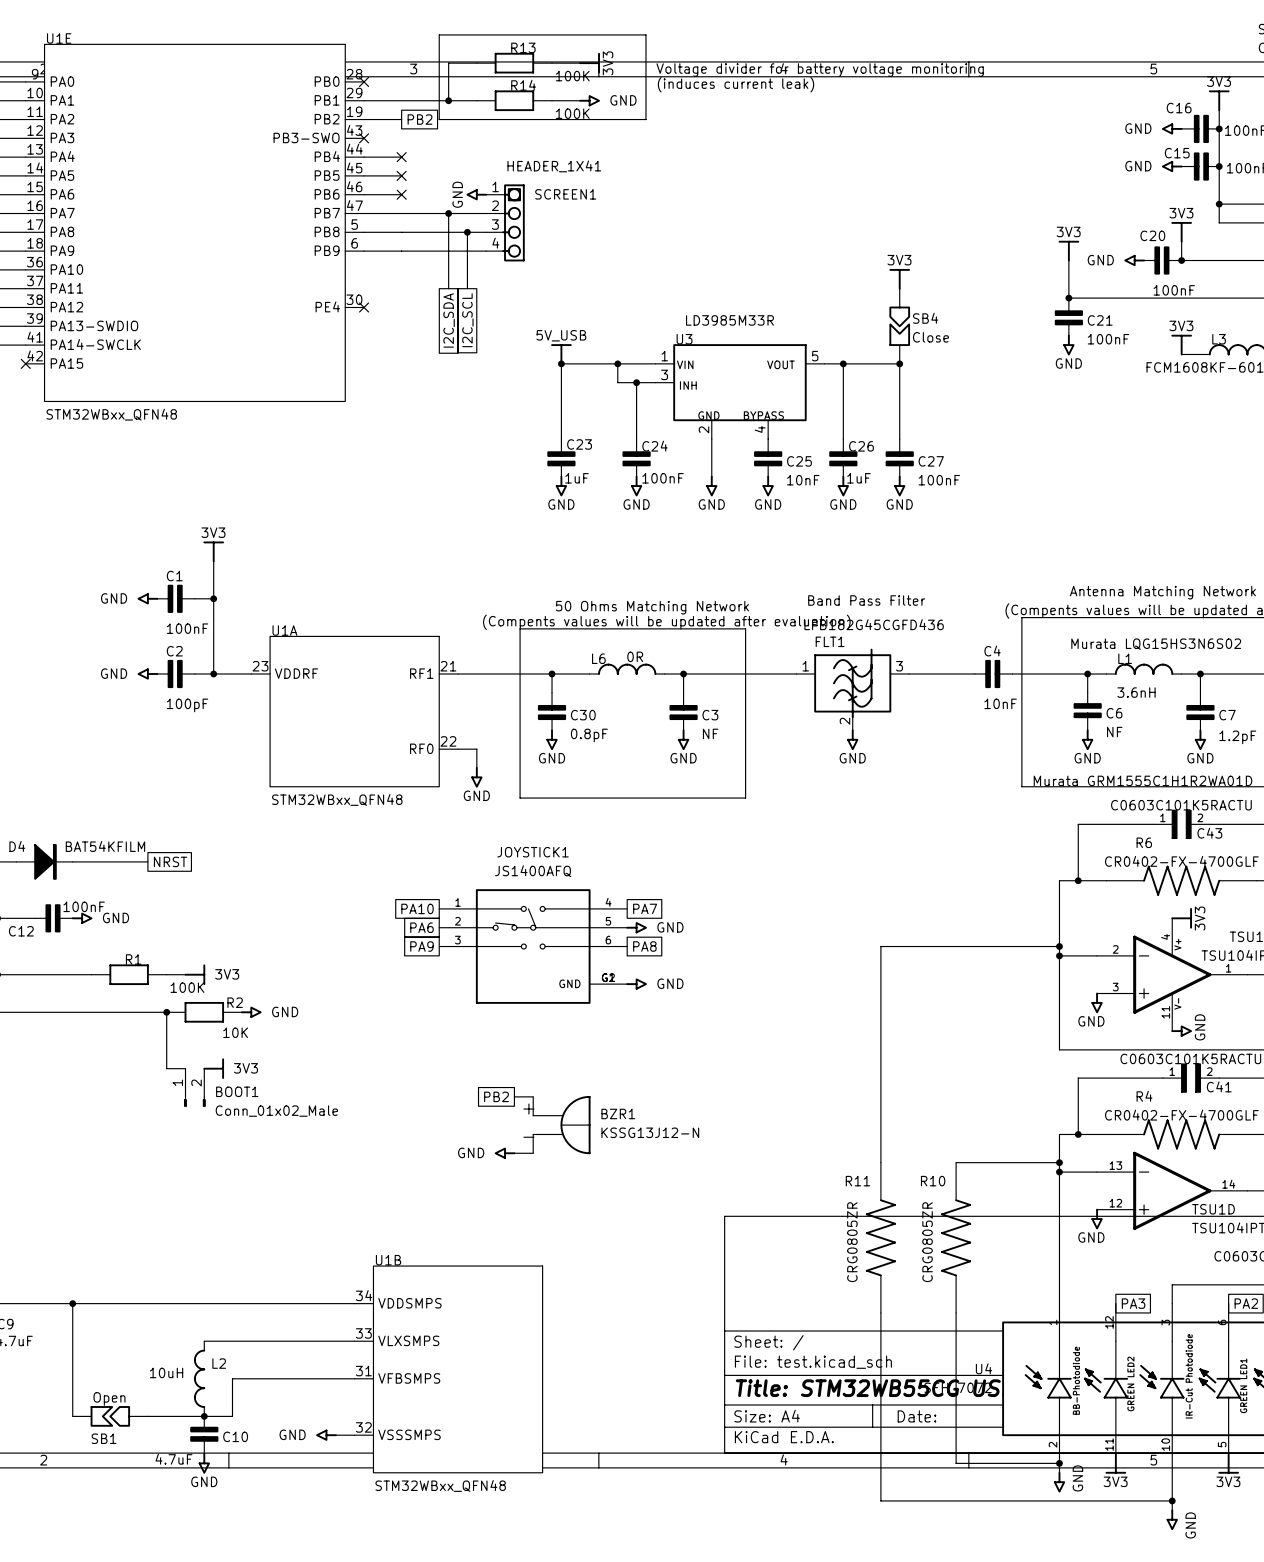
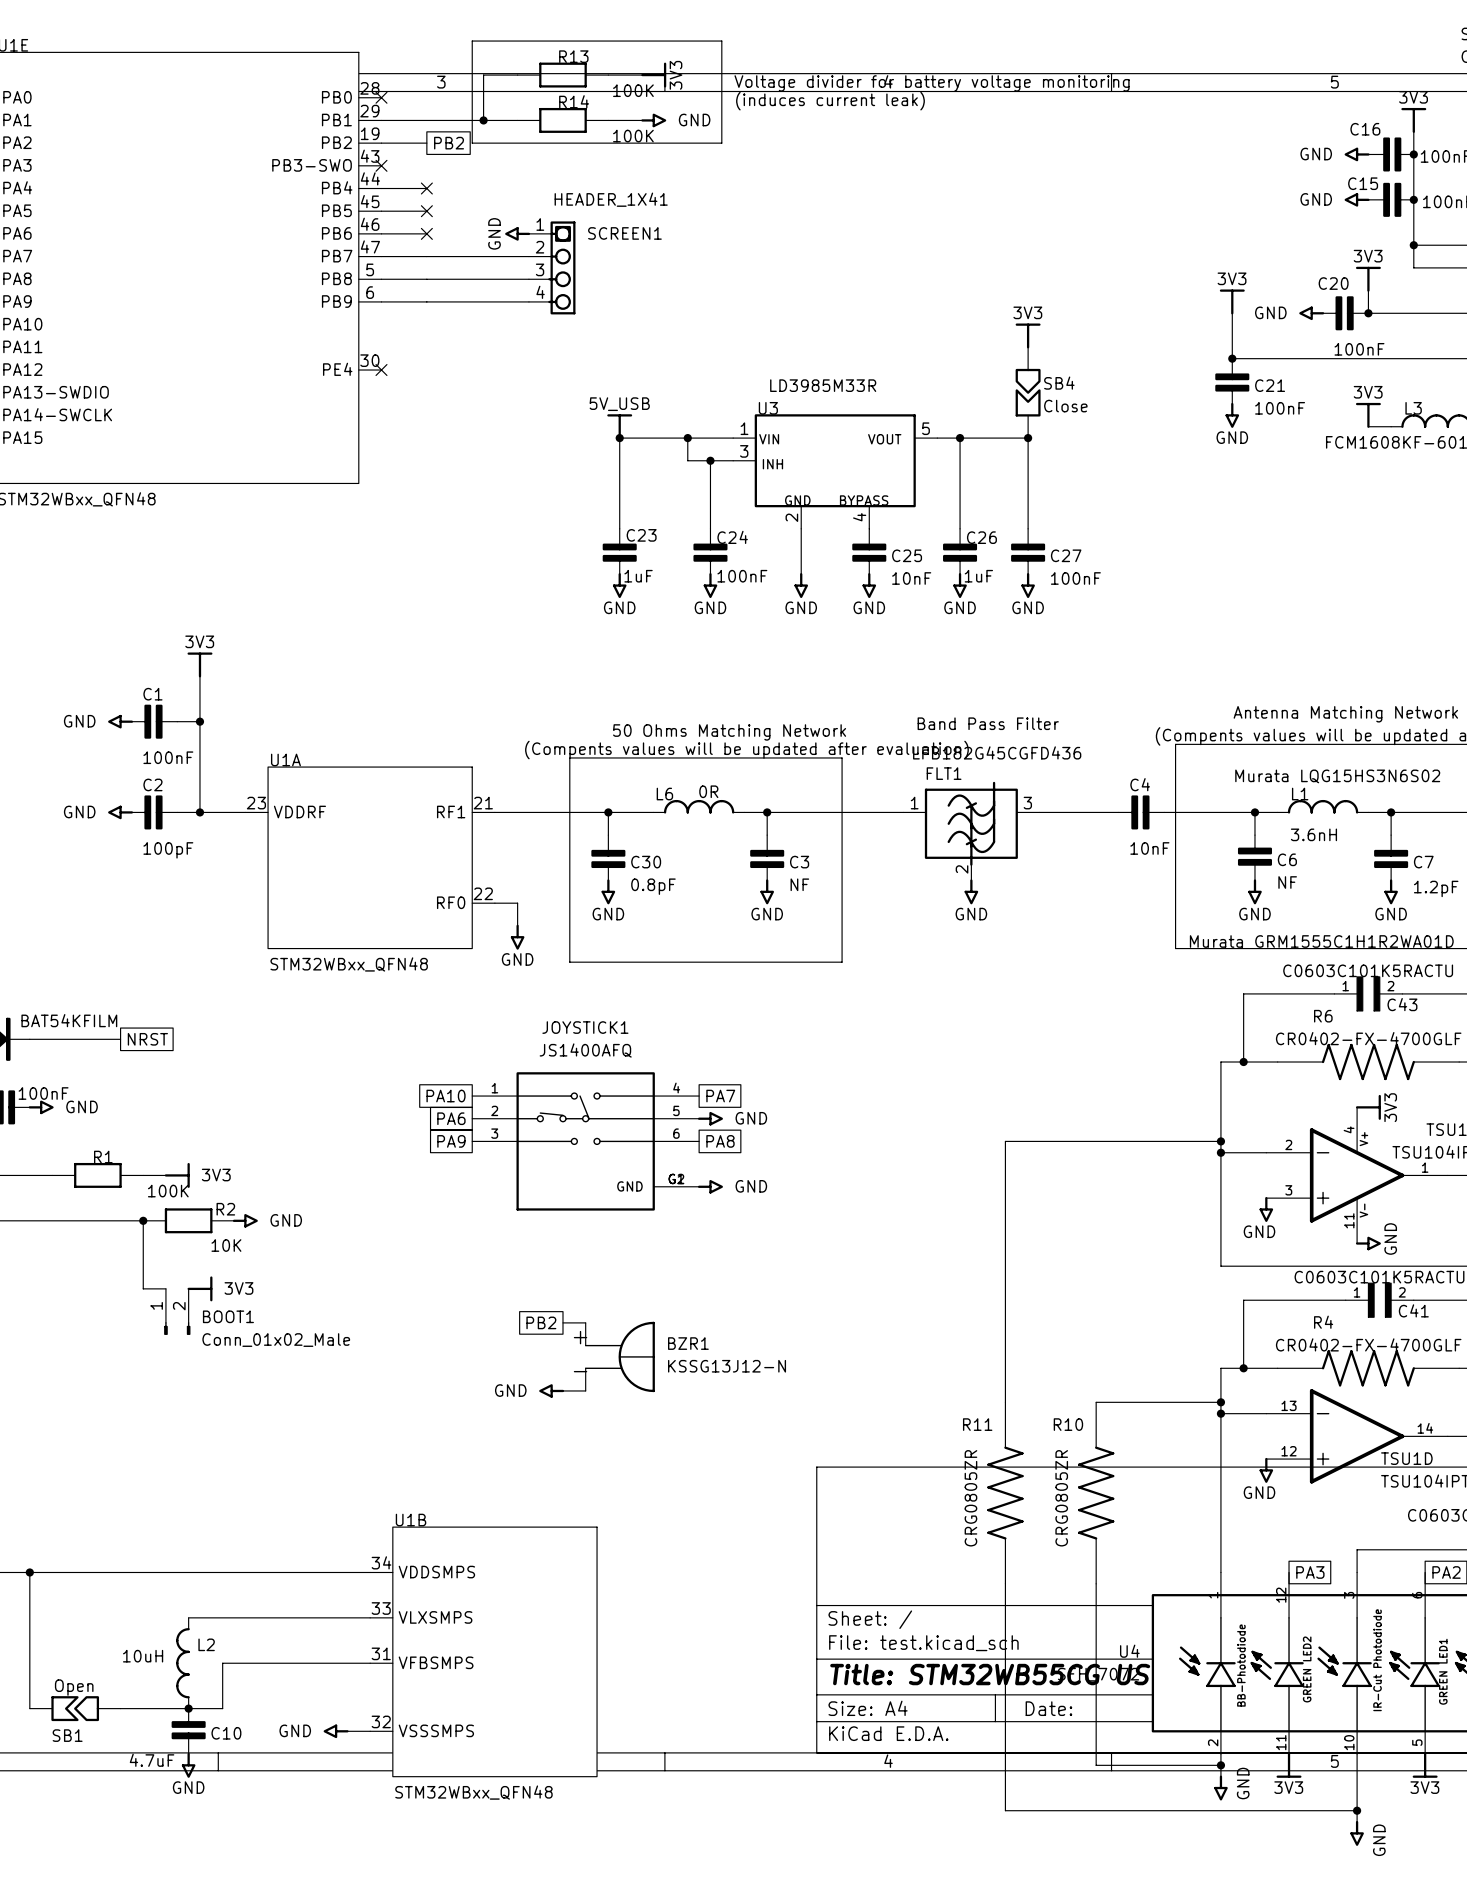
wire: (448, 213) (448, 288) -> none
junction: (448, 213) -> none
wire: (467, 232) (467, 288) -> none
junction: (467, 232) -> none
global label: I2C_SDA (449, 320) -> none
global label: I2C_SCL (467, 320) -> none

